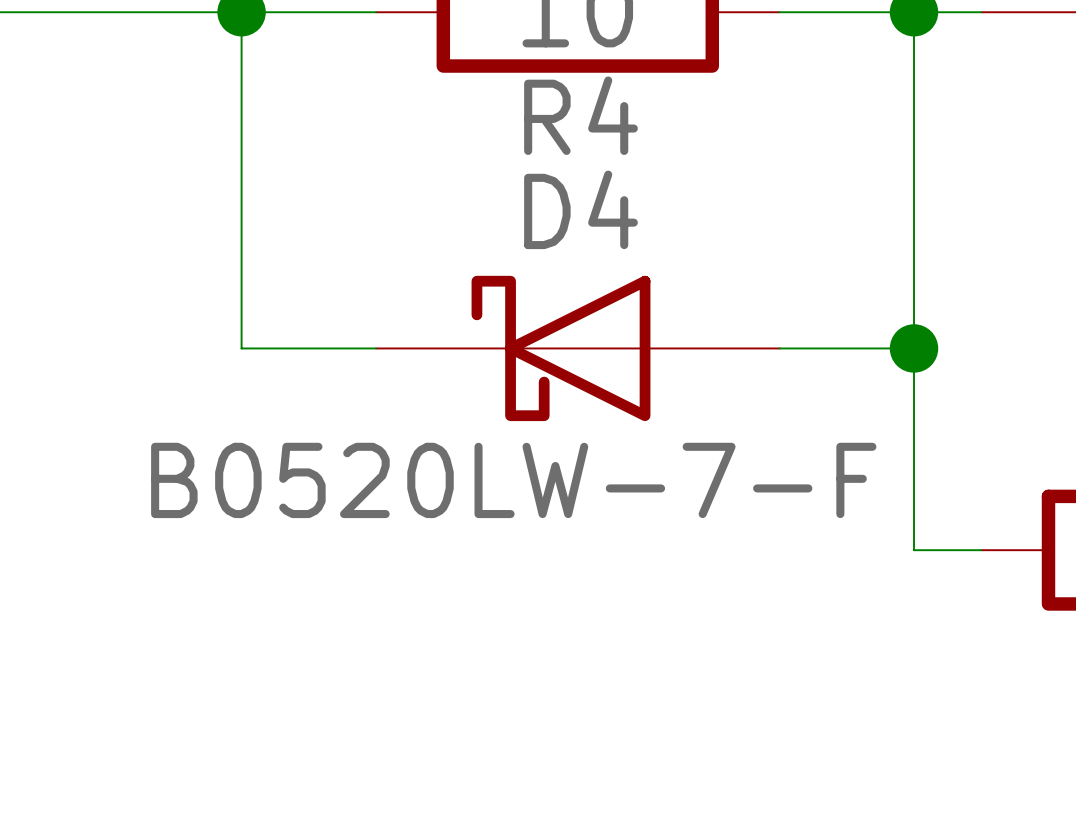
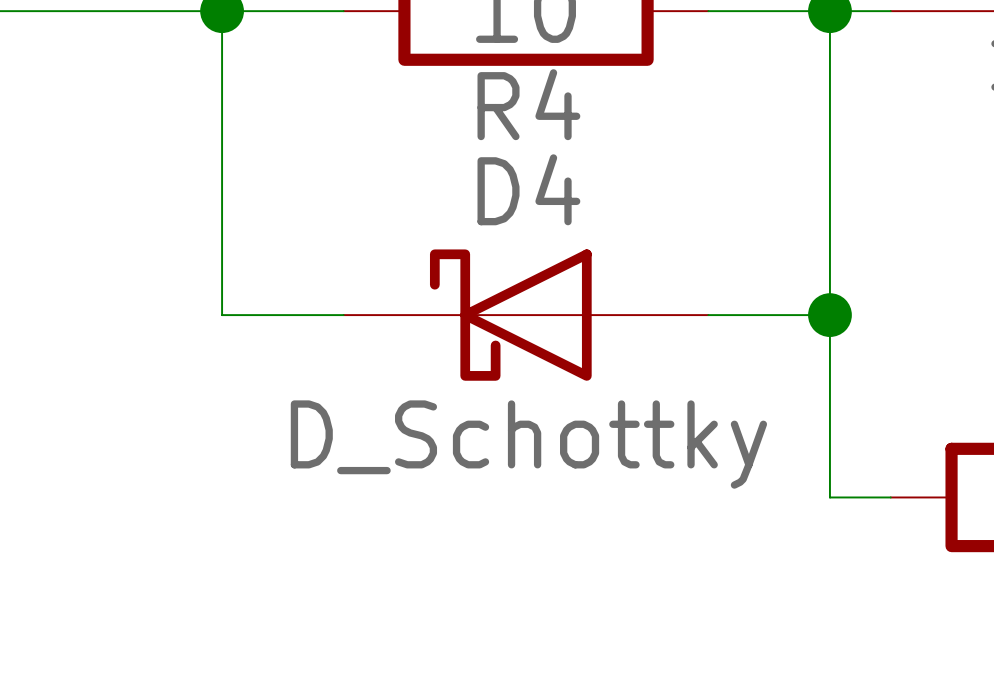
D4 value: B0520LW-7-F (513, 480) -> D_Schottky (528, 444)

